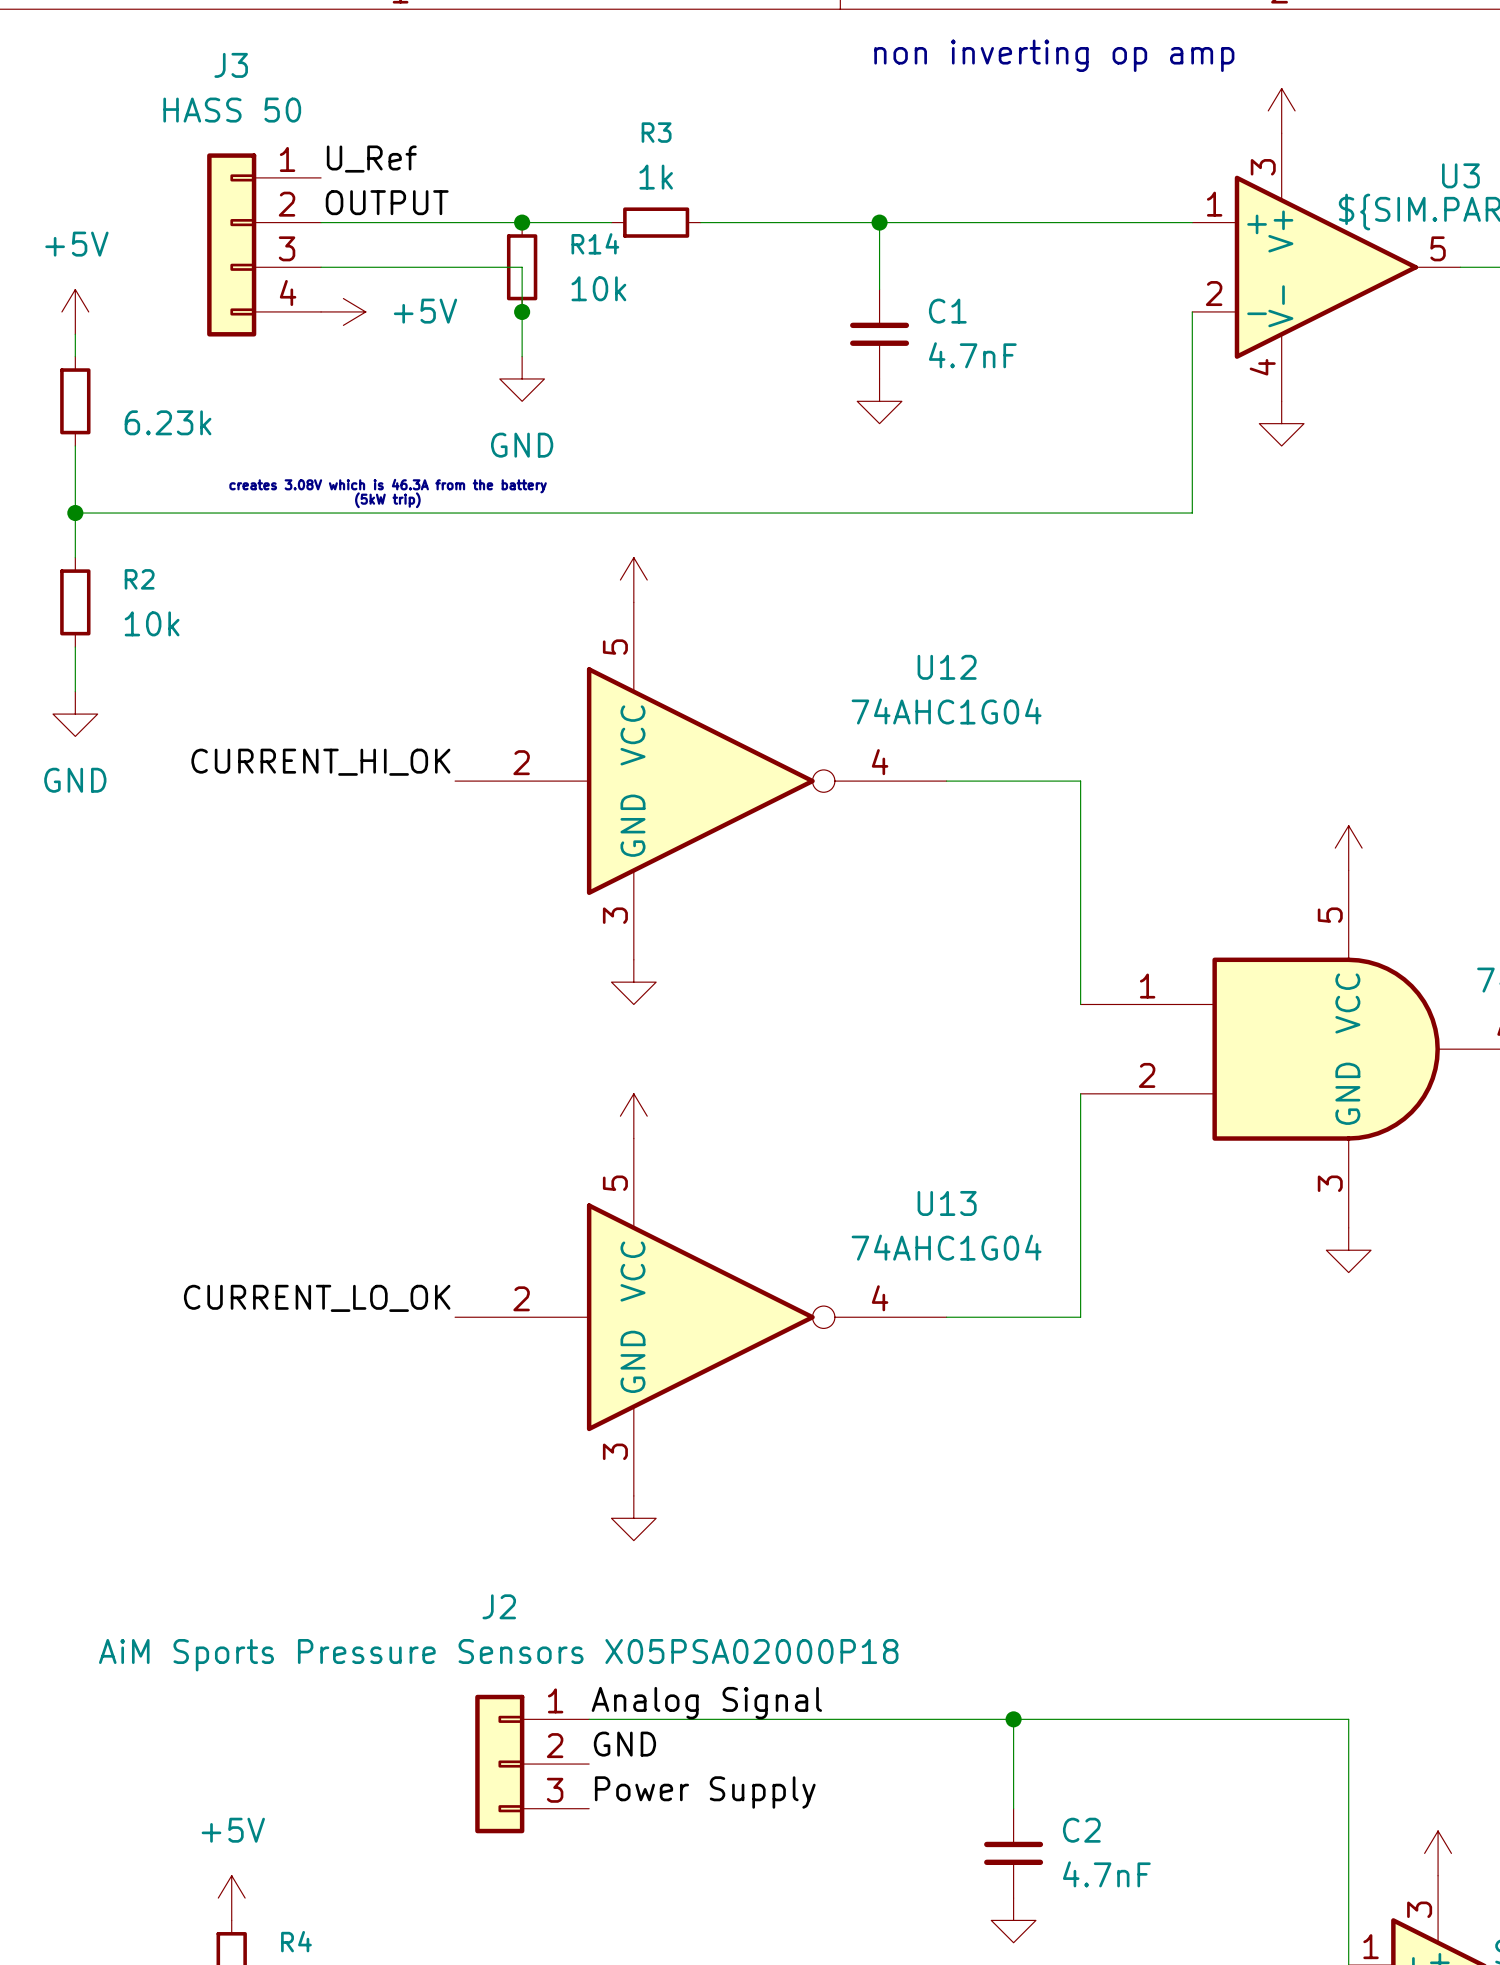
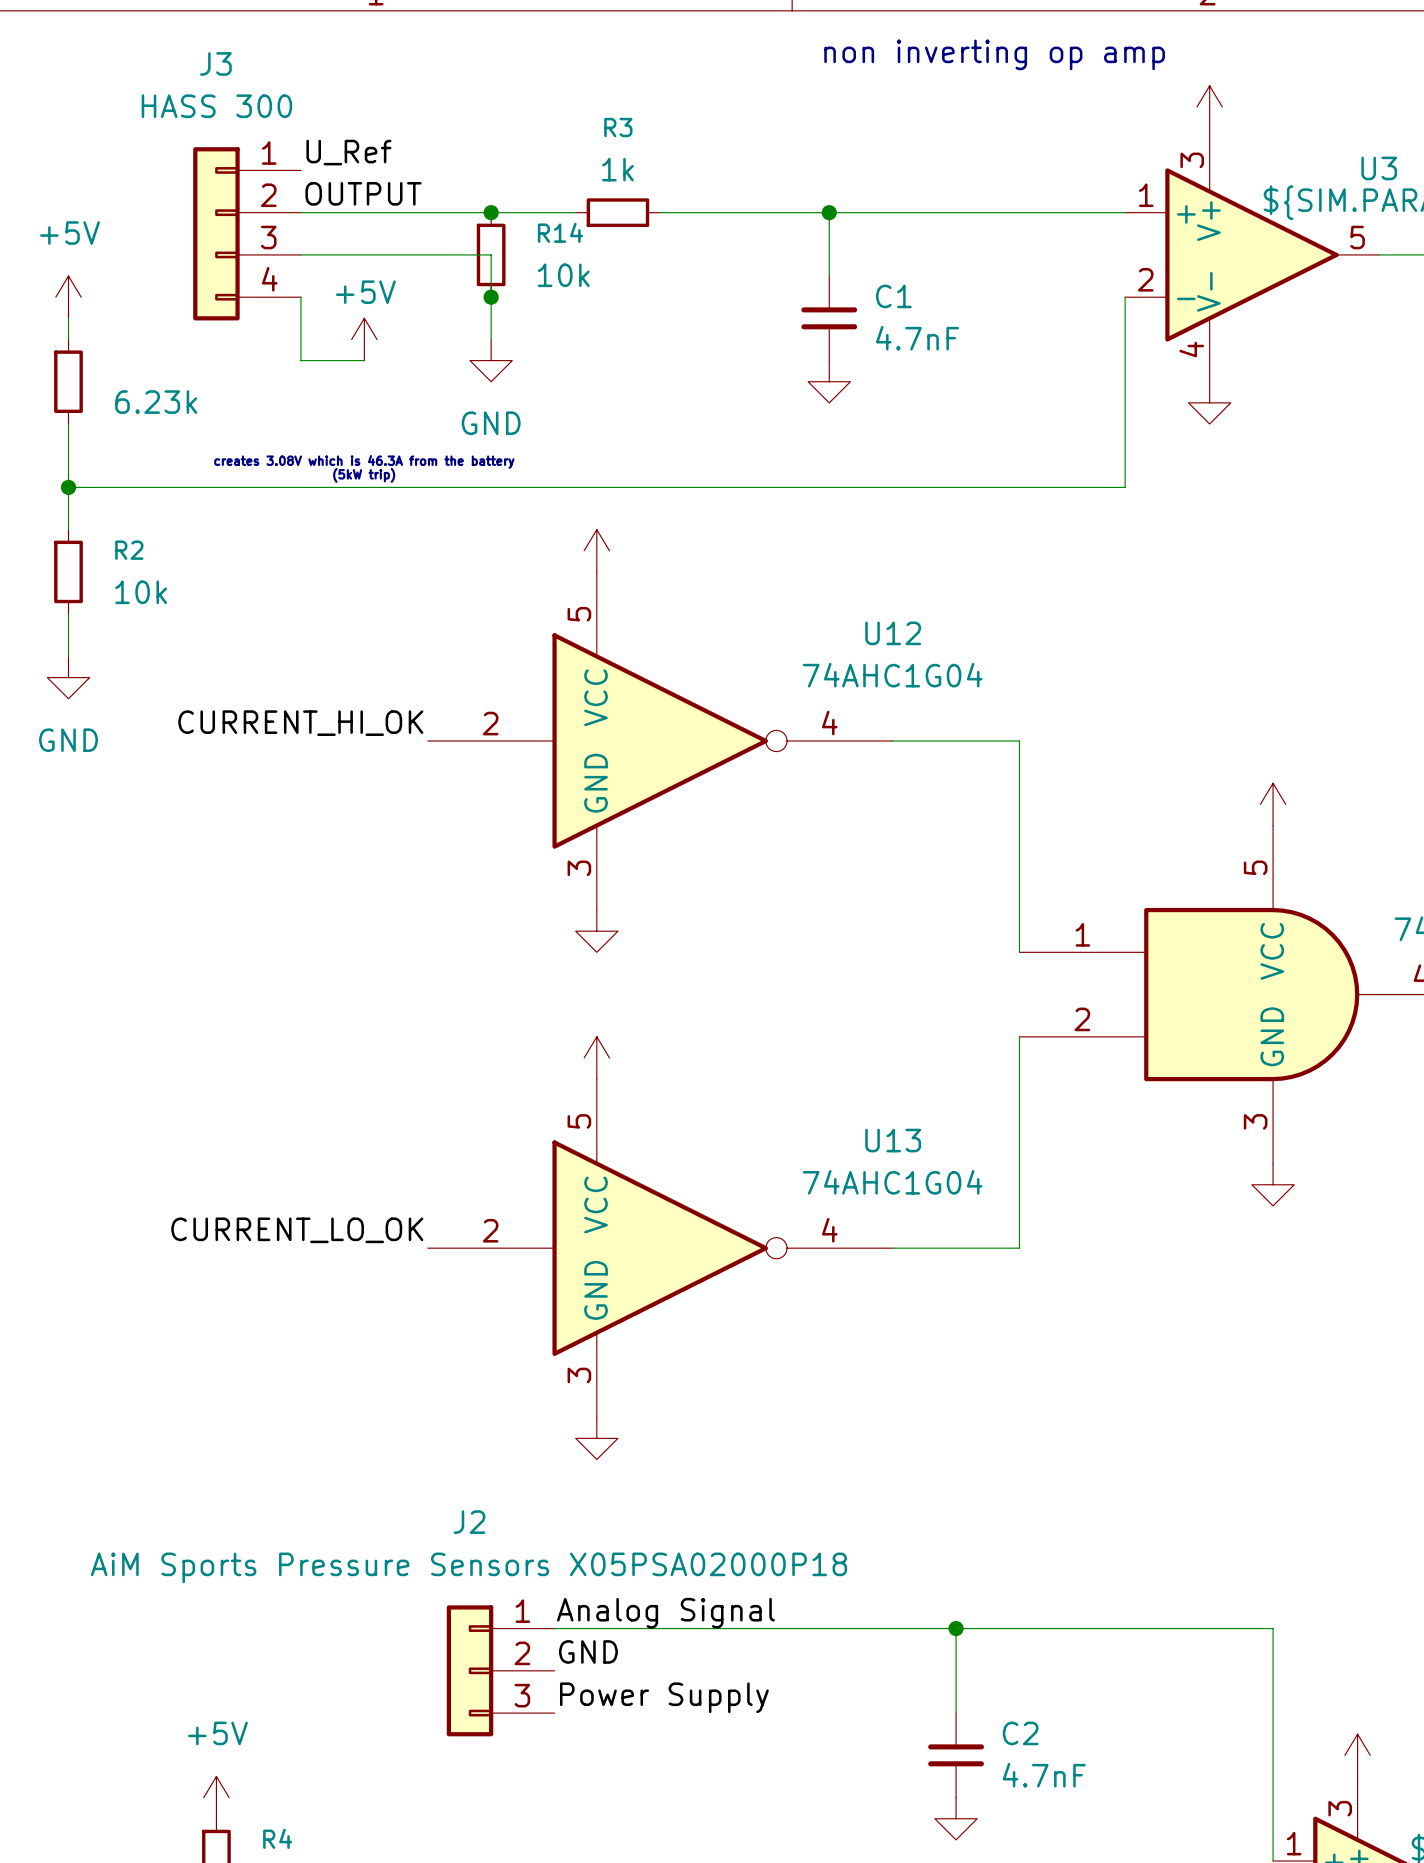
J3 value: HASS 50 (232, 110) -> HASS 300 (216, 106)
wire: none -> (300, 297) (300, 360) (364, 360)
power symbol rotation: 0° (343, 311) -> 90° counterclockwise (364, 339)
power symbol position: +5V (343, 311) -> +5V (364, 339)
power symbol text position: +5V (425, 311) -> +5V (365, 292)

